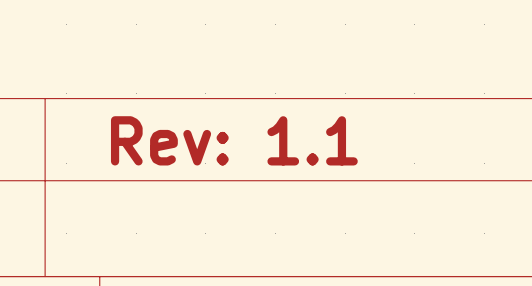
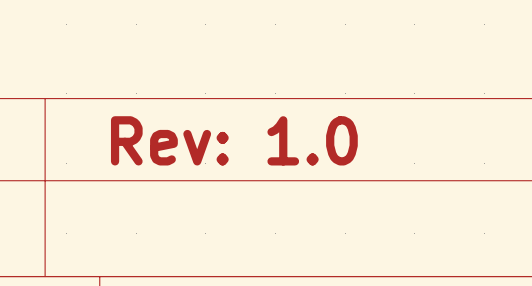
title block: Rev: 1.1 (234, 140) -> Rev: 1.0 (234, 140)

